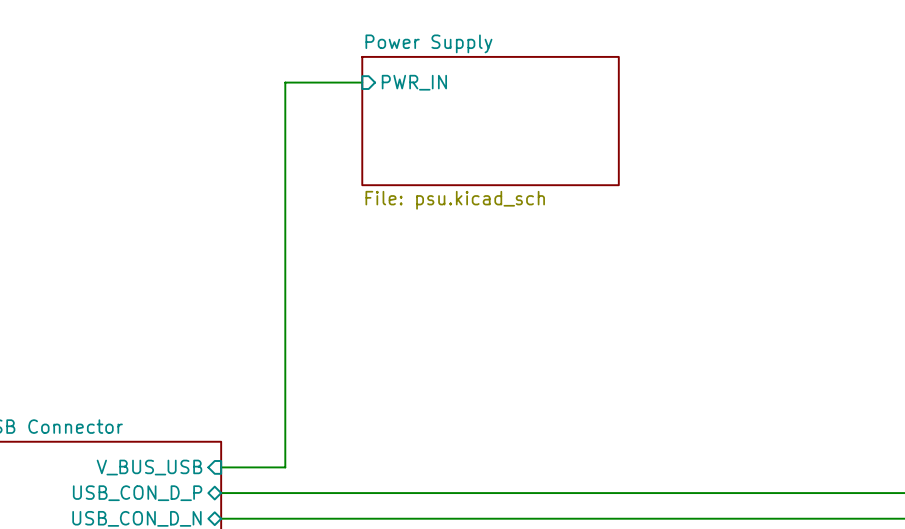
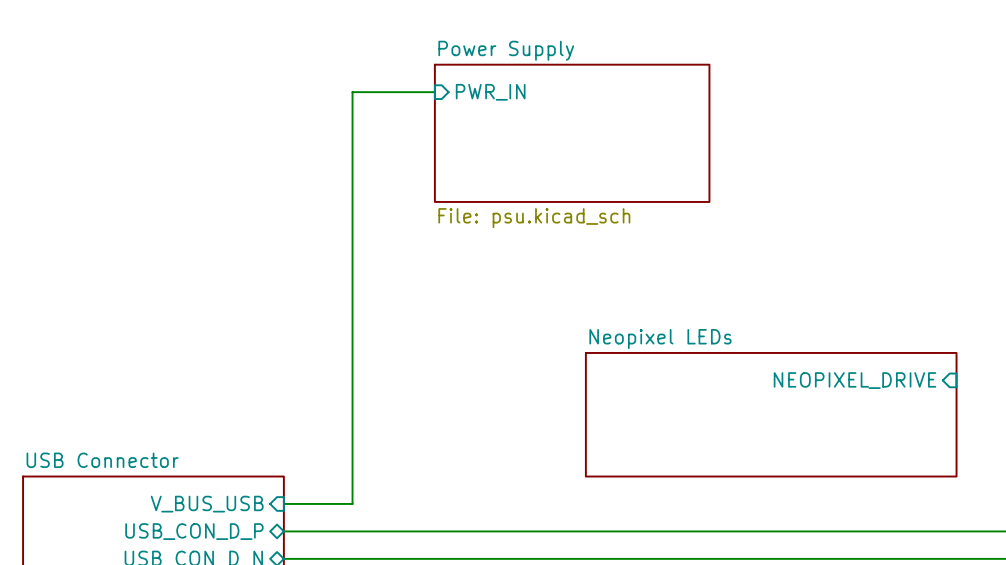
sheet pin: none -> NEOPIXEL_DRIVE (855, 380)
sheet Neopixel LEDs: none -> (771, 414)

